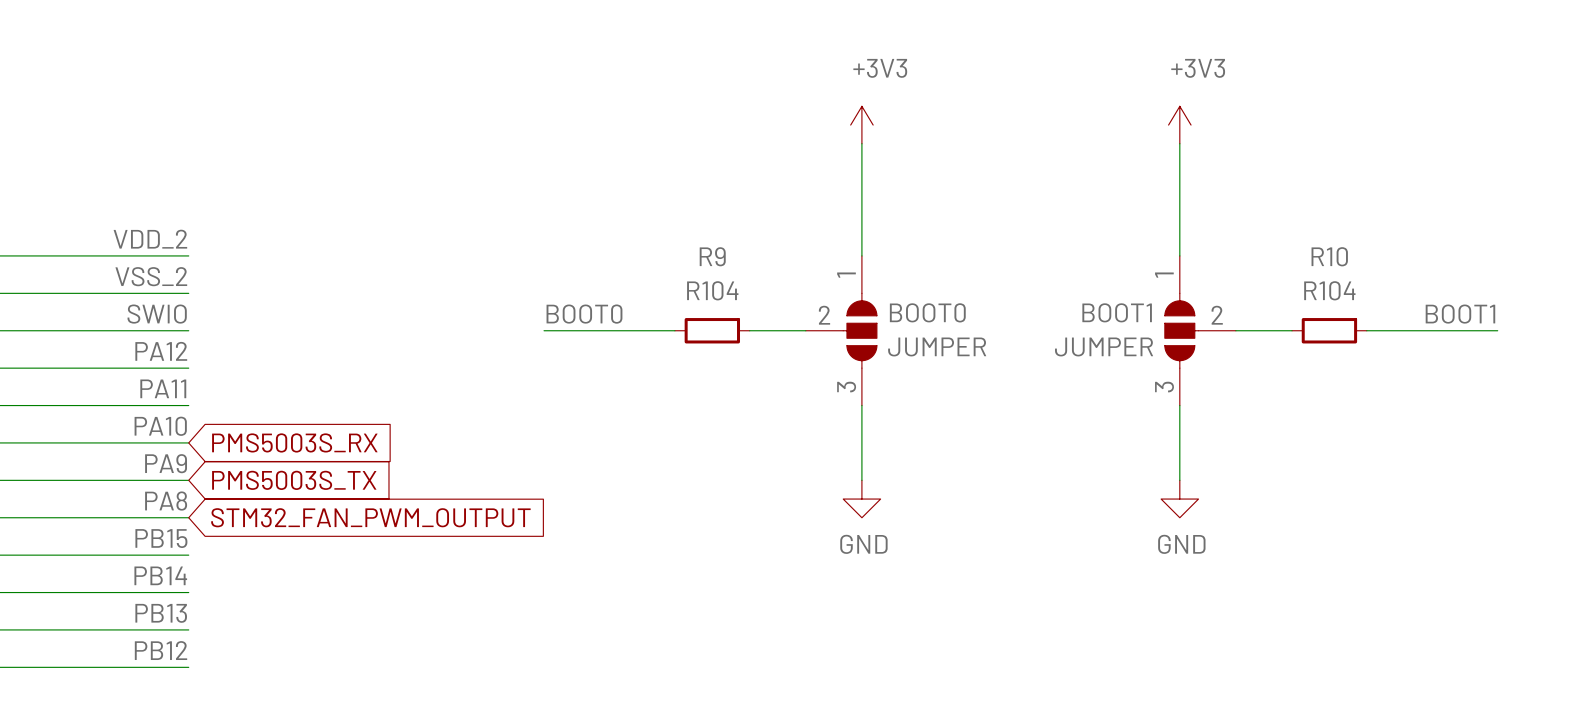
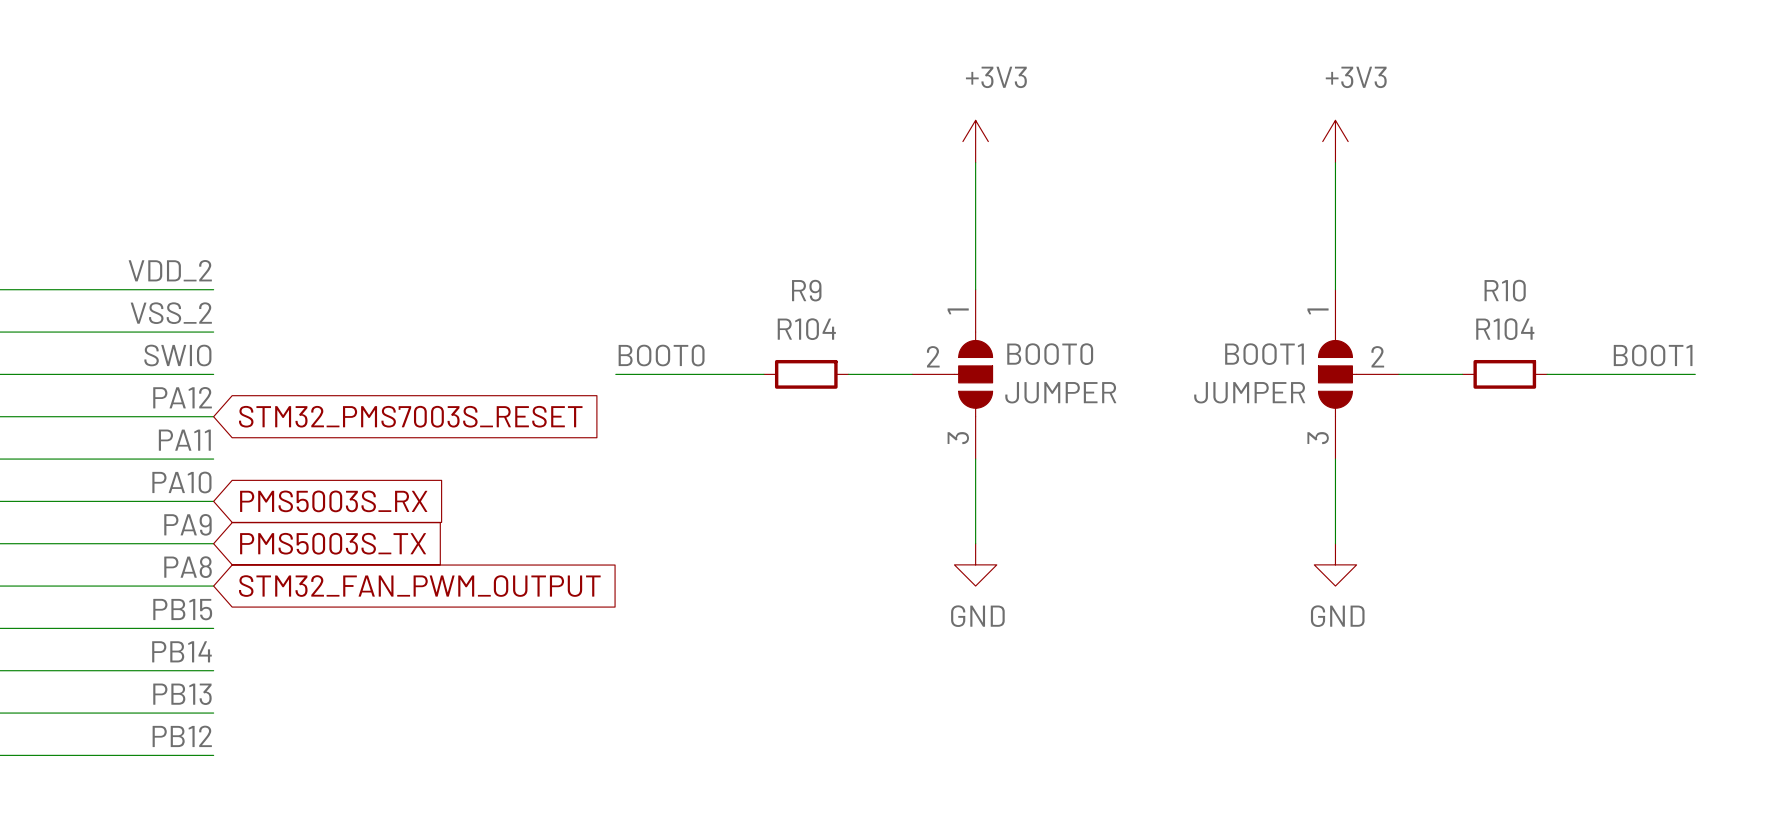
global label: none -> STM32_PMS7003S_RESET (410, 416)

